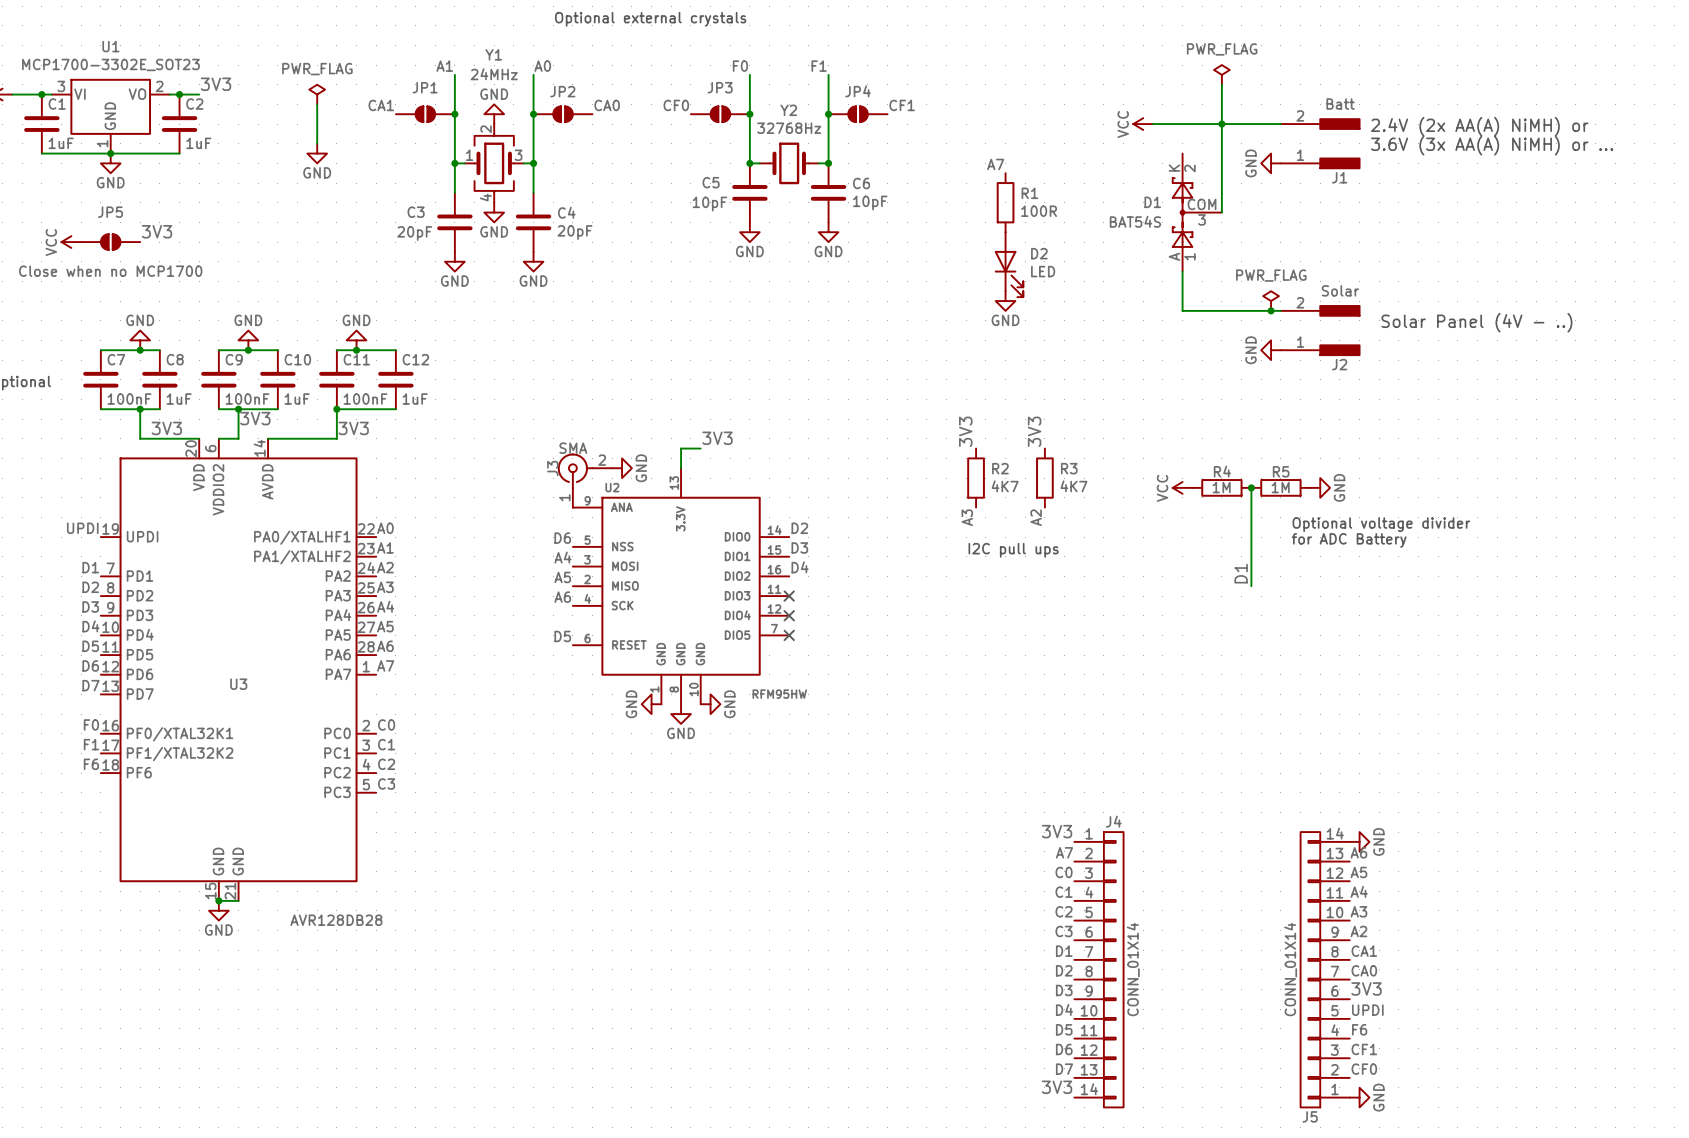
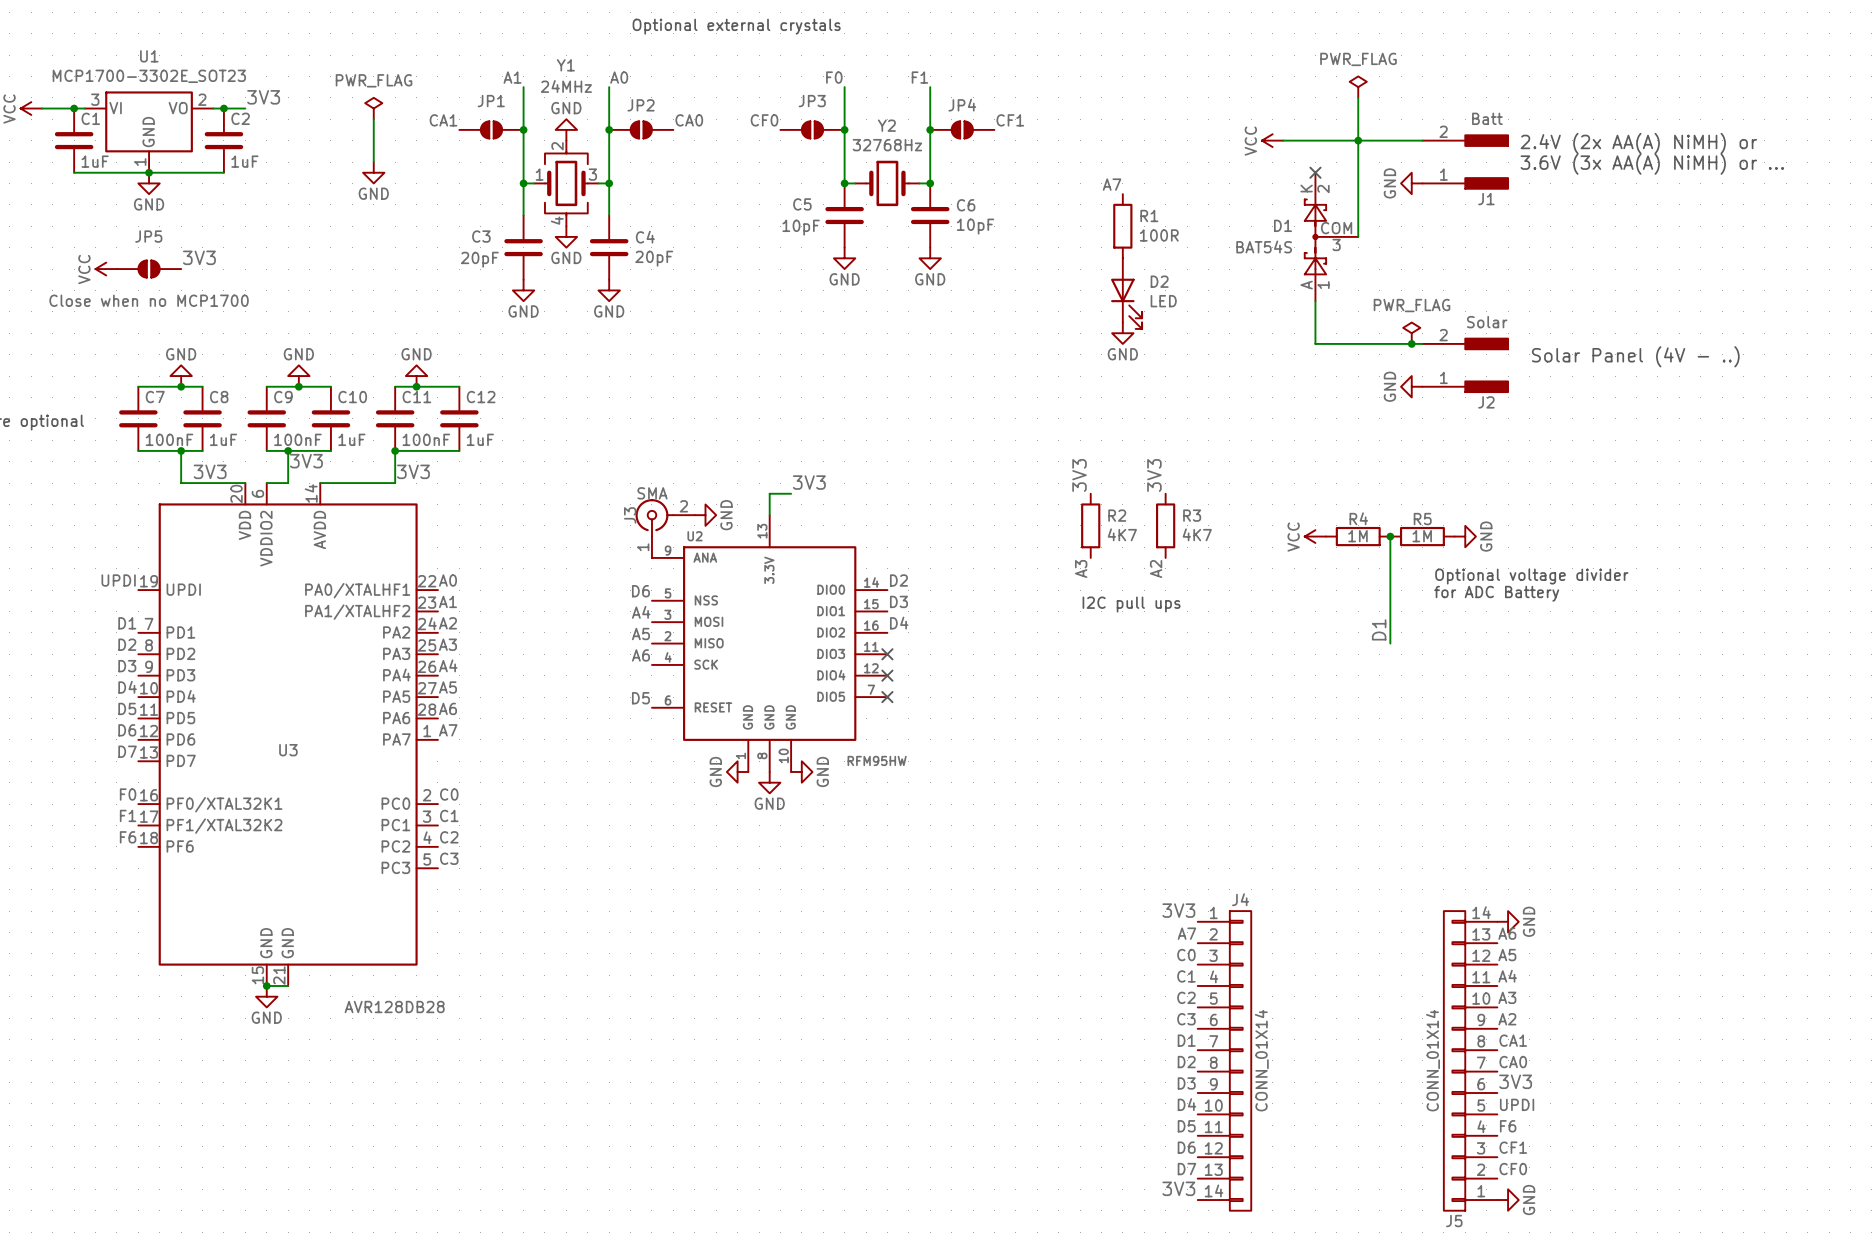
no-connect mark: none -> (1315, 172)

